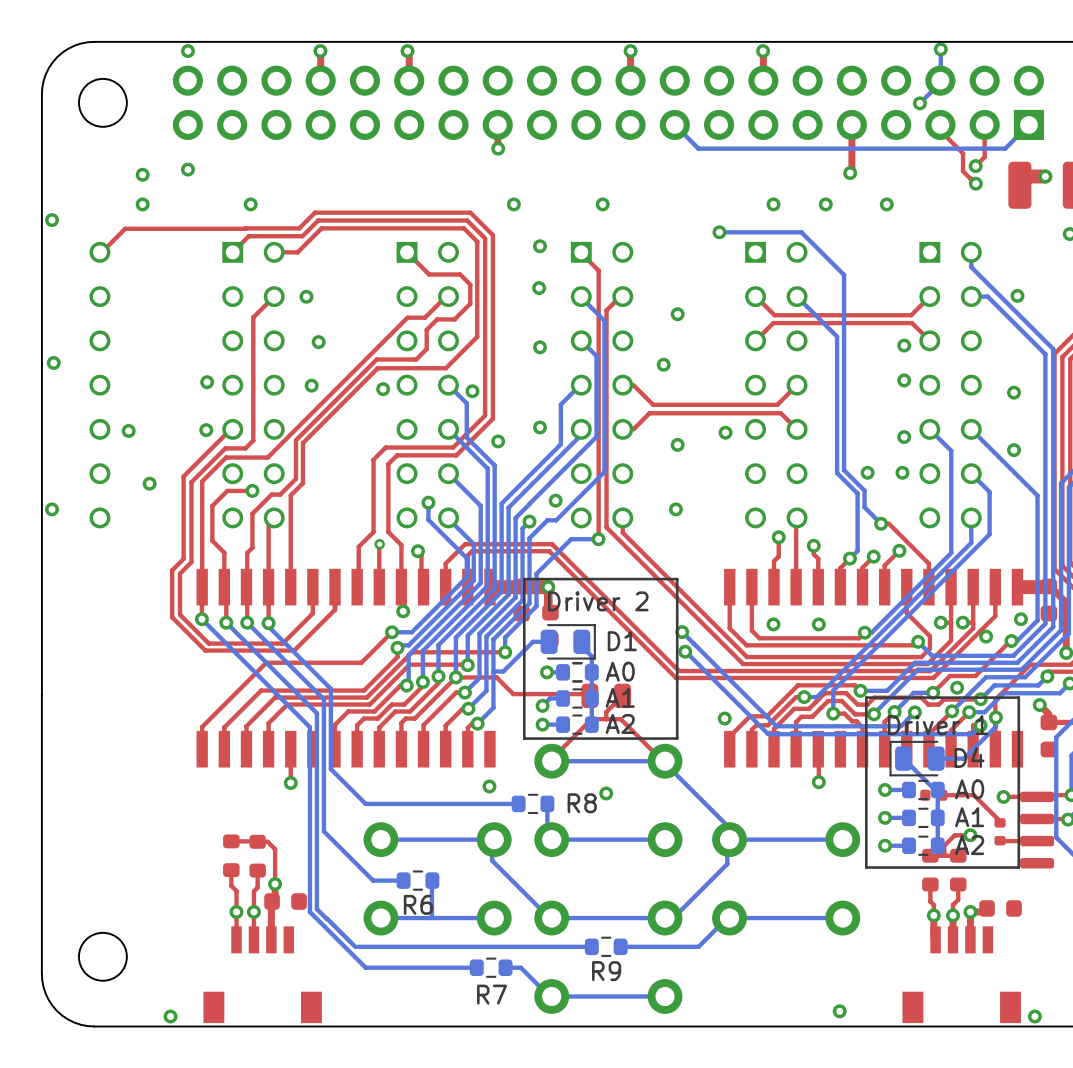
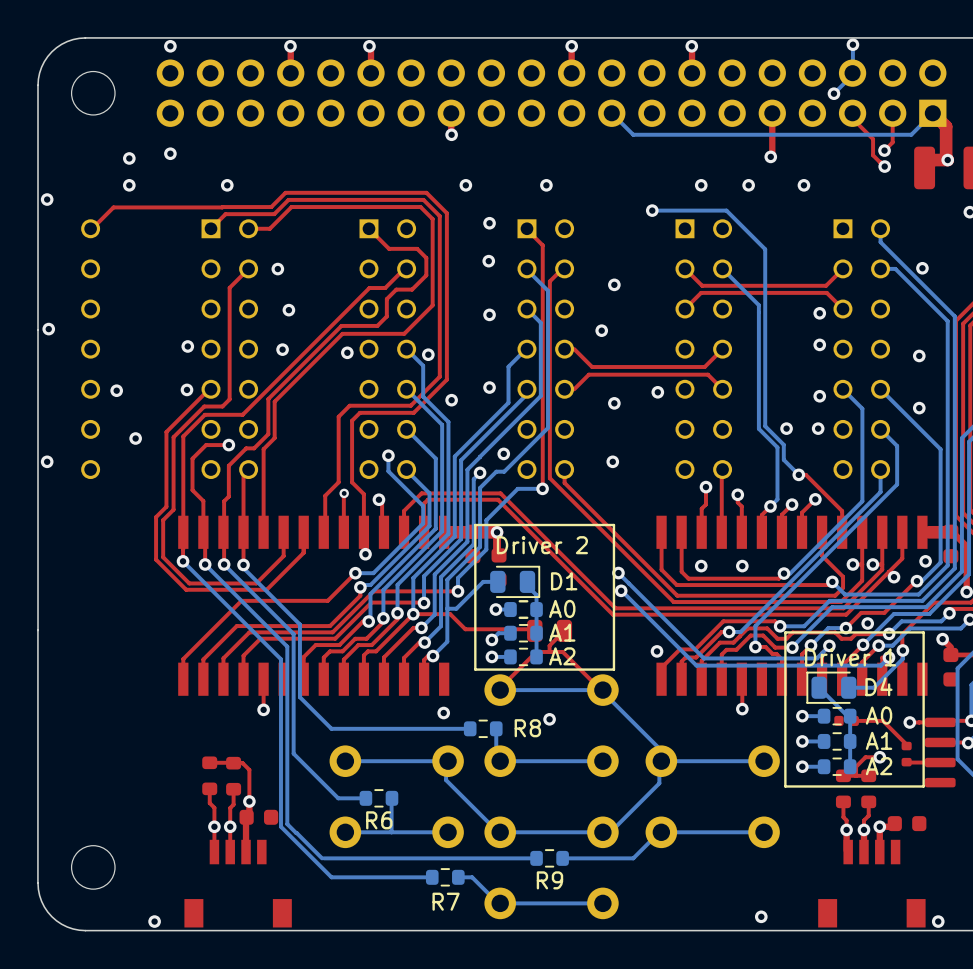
top track: none -> (932, 113) (946, 126) (946, 158) (947, 160)

